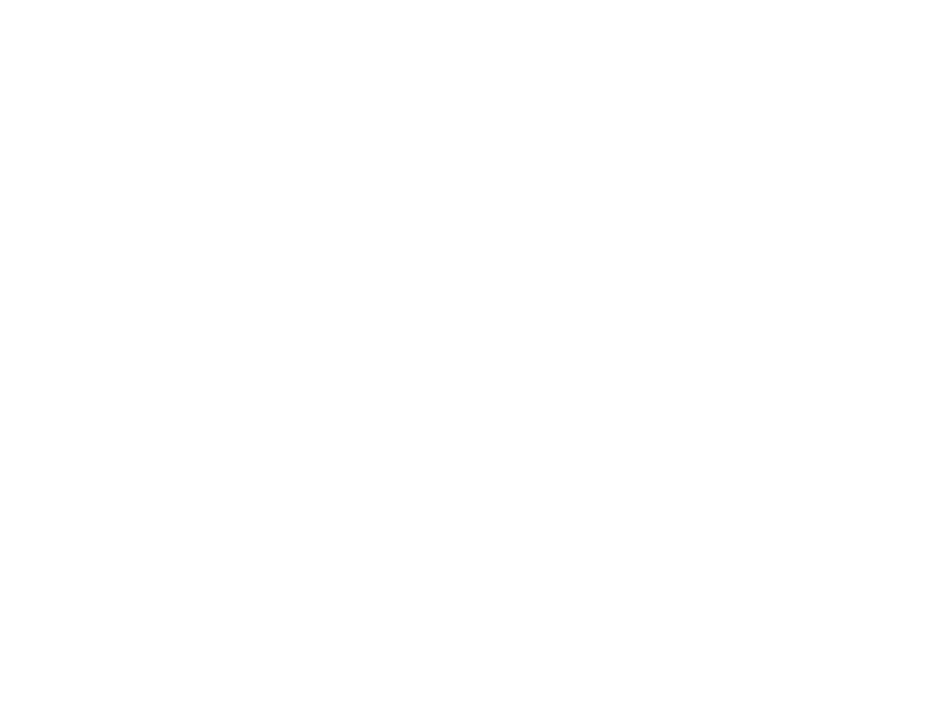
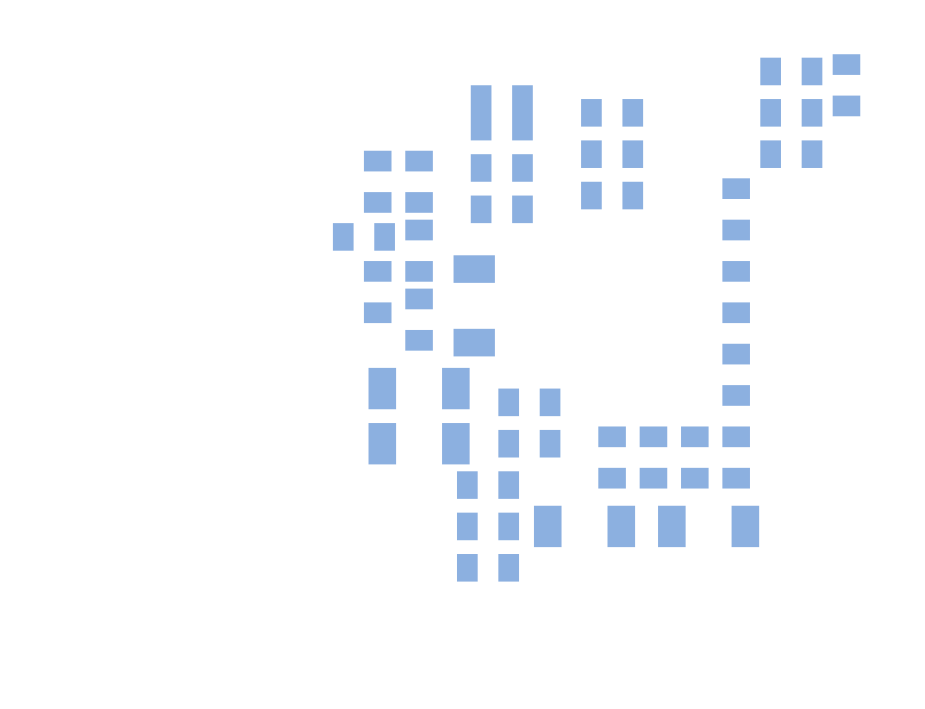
part: none -> (791, 71)
part: none -> (846, 85)
part: none -> (501, 99)
part: none -> (612, 112)
part: none -> (791, 112)
part: none -> (501, 126)
part: none -> (612, 154)
part: none -> (791, 154)
part: none -> (501, 167)
part: none -> (377, 181)
part: none -> (419, 181)
part: none -> (612, 195)
part: none -> (501, 209)
part: none -> (736, 209)
part: none -> (363, 236)
part: none -> (419, 250)
part: none -> (377, 292)
part: none -> (736, 292)
part: none -> (474, 305)
part: none -> (419, 319)
part: none -> (736, 374)
part: none -> (419, 388)
part: none -> (529, 402)
part: none -> (419, 443)
part: none -> (529, 443)
part: none -> (612, 457)
part: none -> (653, 457)
part: none -> (694, 457)
part: none -> (736, 457)
part: none -> (488, 485)
part: none -> (488, 526)
part: none -> (584, 526)
part: none -> (708, 526)
part: none -> (488, 567)

